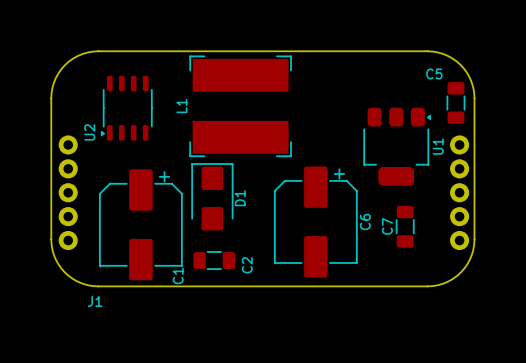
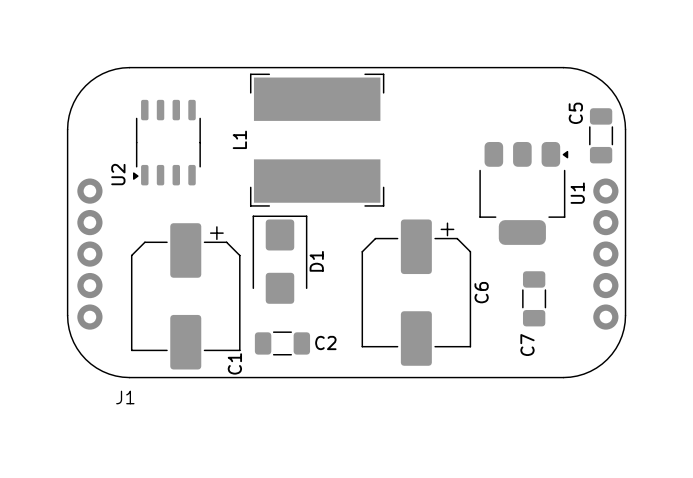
C5 name rotation: 0° (434, 73) -> 90° counterclockwise (575, 113)
C7 name position: C7 (387, 226) -> C7 (527, 345)
C2 name rotation: 0° (247, 265) -> 90° clockwise (325, 343)

